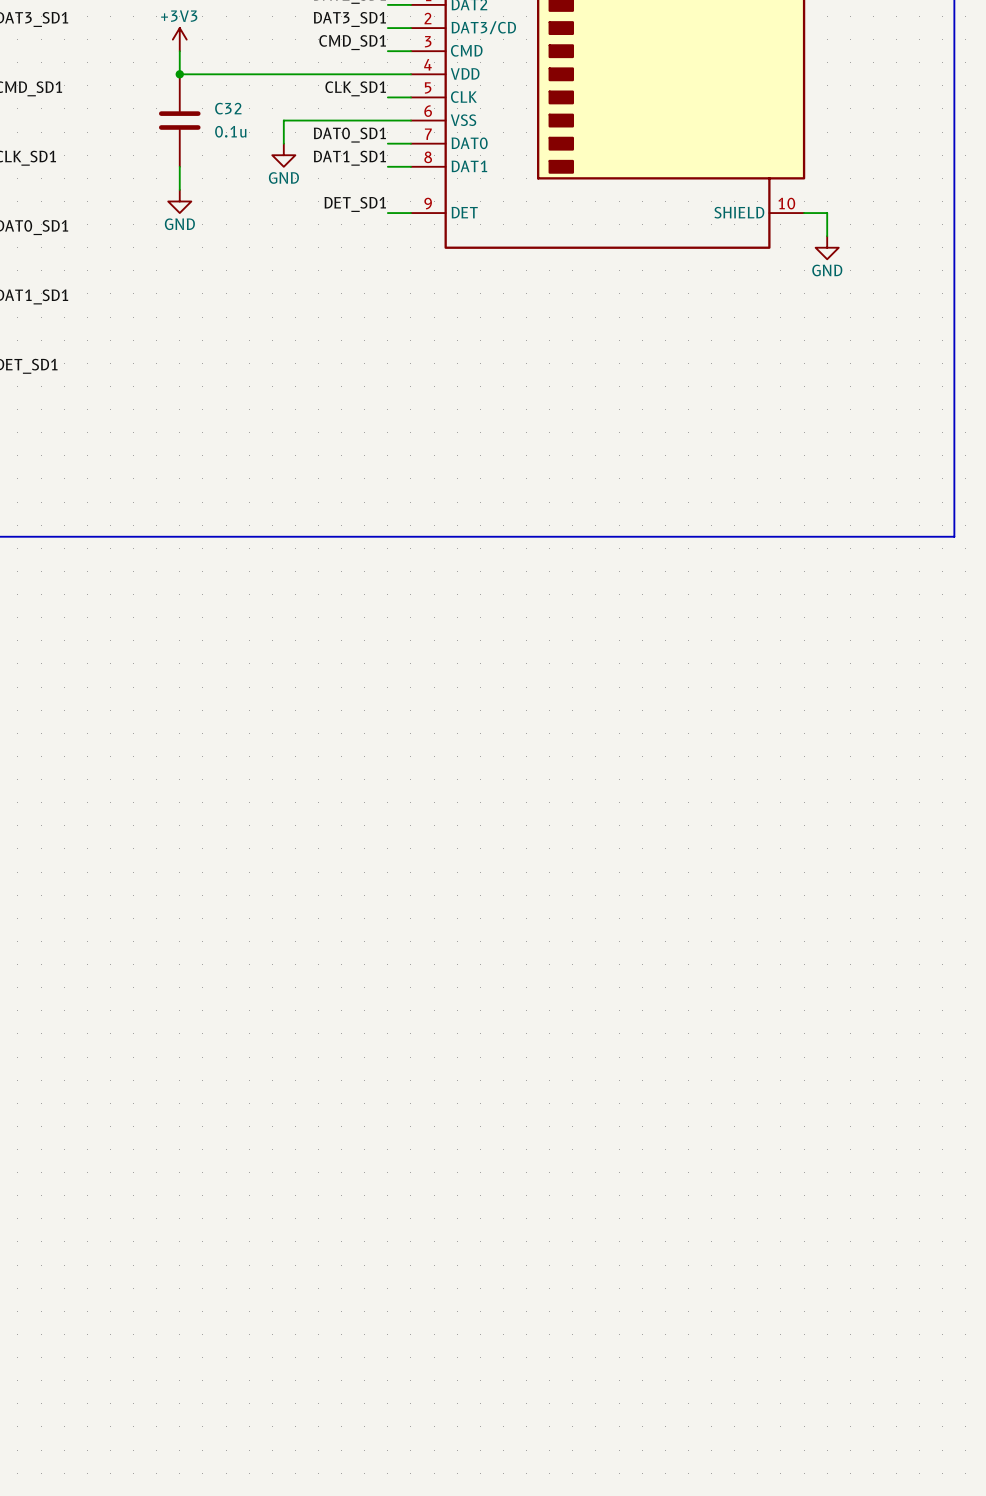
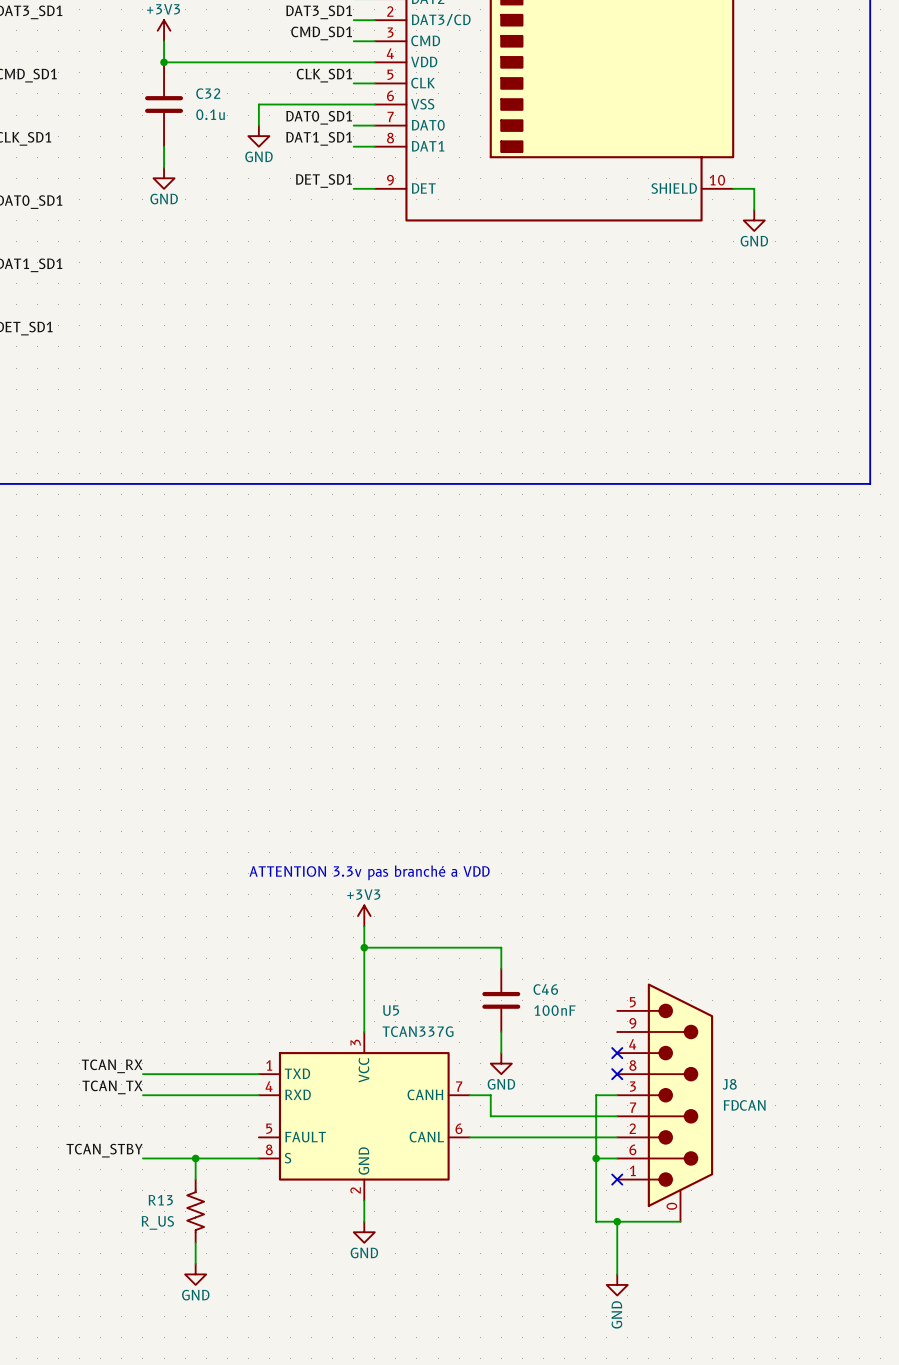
text: none -> ATTENTION 3.3v pas branché a VDD (369, 872)
power symbol: none -> +3V3 (364, 916)
wire: none -> (364, 926) (364, 1032)
wire: none -> (364, 947) (501, 947) (501, 968)
junction: none -> (364, 947)
C46: none -> 100nF (501, 1000)
wire: none -> (501, 1032) (501, 1053)
no-connect mark: none -> (617, 1053)
power symbol: none -> GND (501, 1063)
label: none -> TCAN_RX (112, 1066)
wire: none -> (142, 1074) (258, 1074)
no-connect mark: none -> (617, 1074)
label: none -> TCAN_TX (112, 1087)
wire: none -> (142, 1095) (258, 1095)
wire: none -> (469, 1095) (490, 1095) (490, 1116) (617, 1116)
wire: none -> (617, 1095) (596, 1095) (596, 1221) (680, 1221)
J8: none -> FDCAN (665, 1102)
U5: none -> TCAN337G (364, 1116)
wire: none -> (469, 1137) (617, 1137)
label: none -> TCAN_STBY (104, 1150)
wire: none -> (142, 1158) (258, 1158)
wire: none -> (195, 1158) (195, 1179)
junction: none -> (195, 1158)
wire: none -> (596, 1158) (617, 1158)
junction: none -> (596, 1158)
no-connect mark: none -> (617, 1179)
wire: none -> (364, 1200) (364, 1221)
R13: none -> R_US (195, 1211)
wire: none -> (617, 1221) (617, 1274)
junction: none -> (617, 1221)
power symbol: none -> GND (364, 1232)
wire: none -> (195, 1242) (195, 1263)
power symbol: none -> GND (195, 1274)
power symbol: none -> GND (617, 1284)

